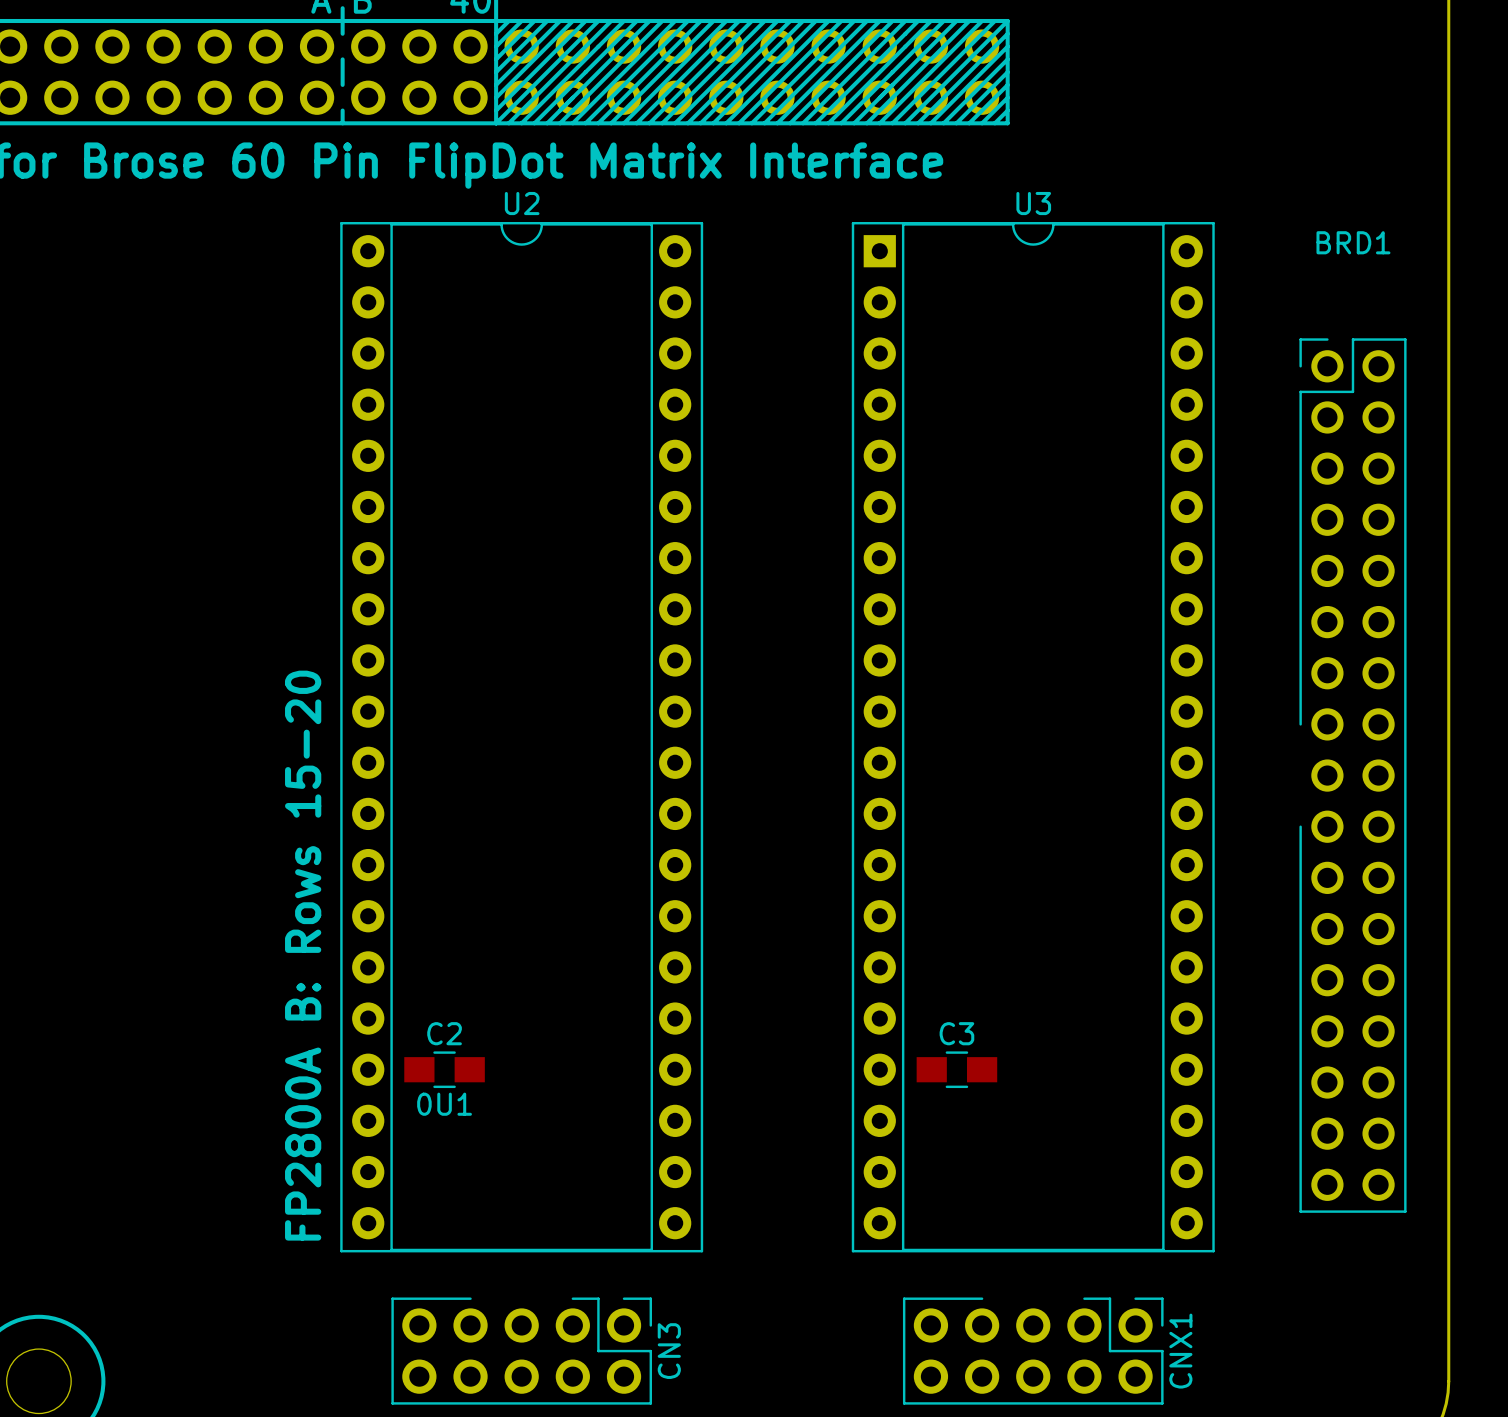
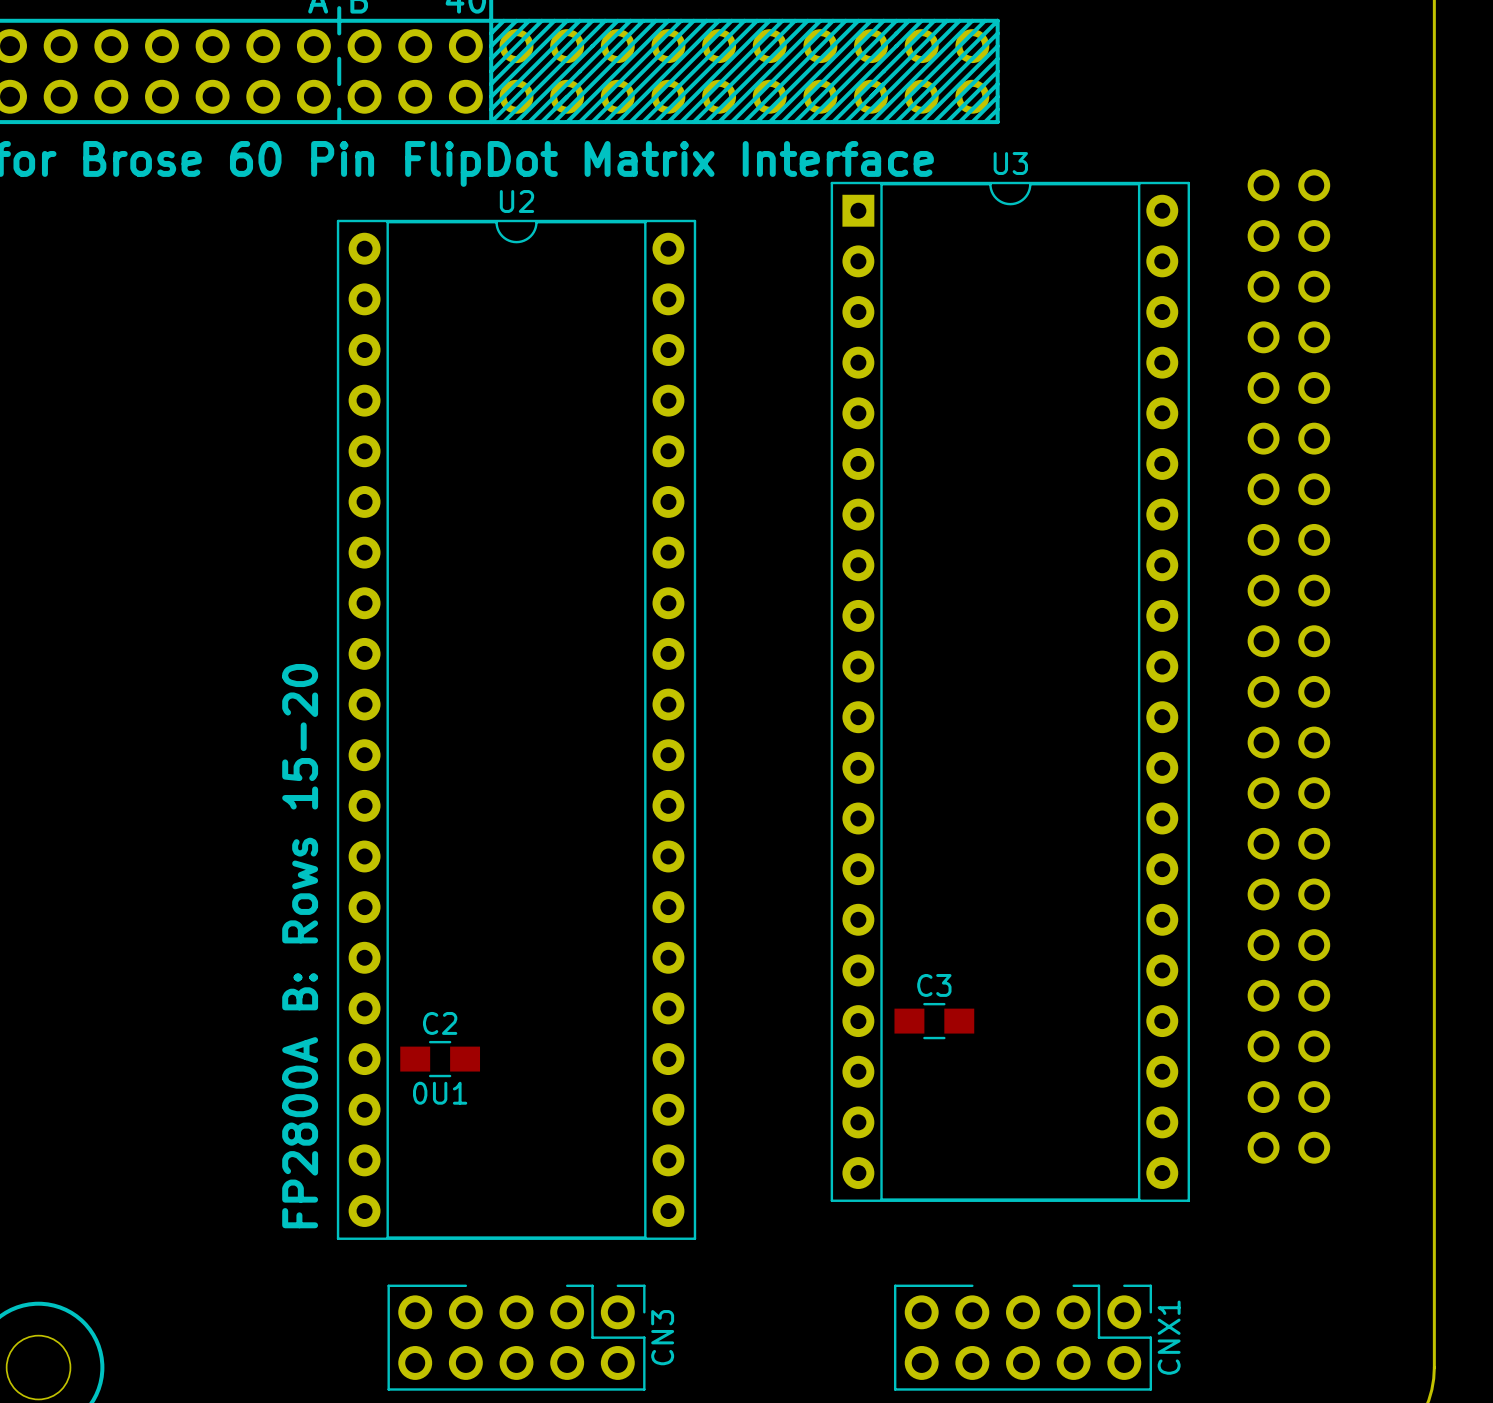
part: none -> (1288, 666)
U3 position: (1033, 737) -> (1010, 691)
BRD1: (1352, 775) -> none
C3 position: (956, 1069) -> (934, 1021)

